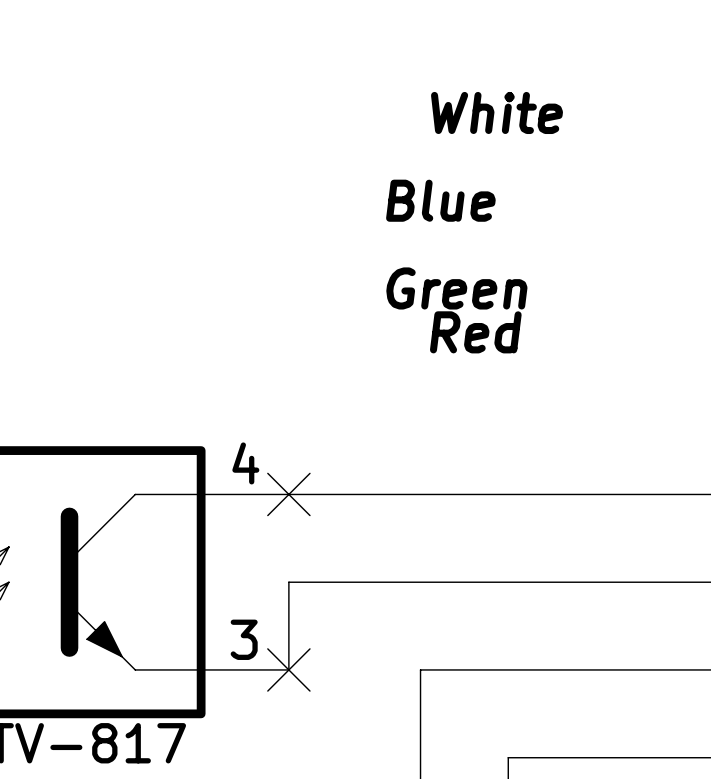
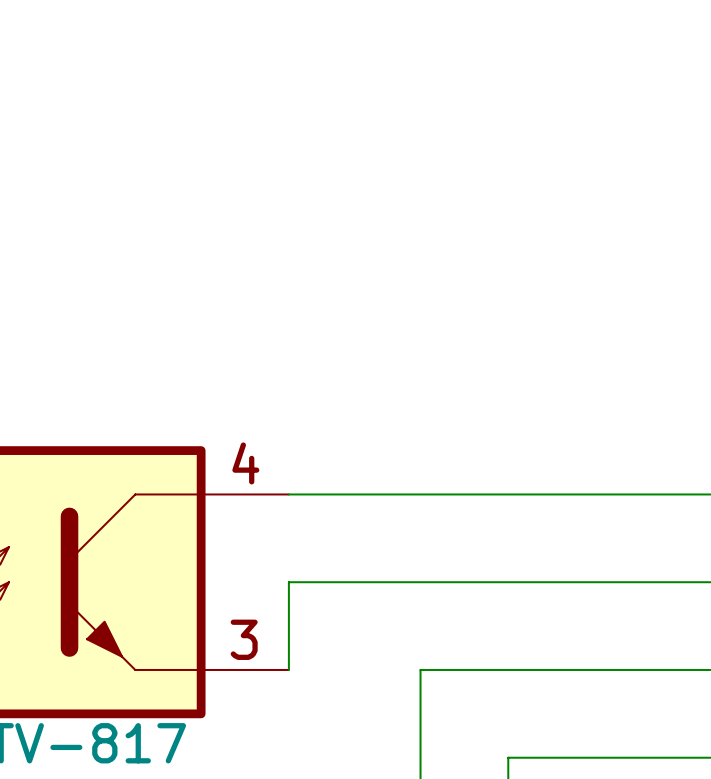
text: White (497, 112) -> none
text: Blue (440, 200) -> none
text: Green (456, 288) -> none
text: Red (475, 332) -> none
no-connect mark: (288, 494) -> none
no-connect mark: (288, 669) -> none

